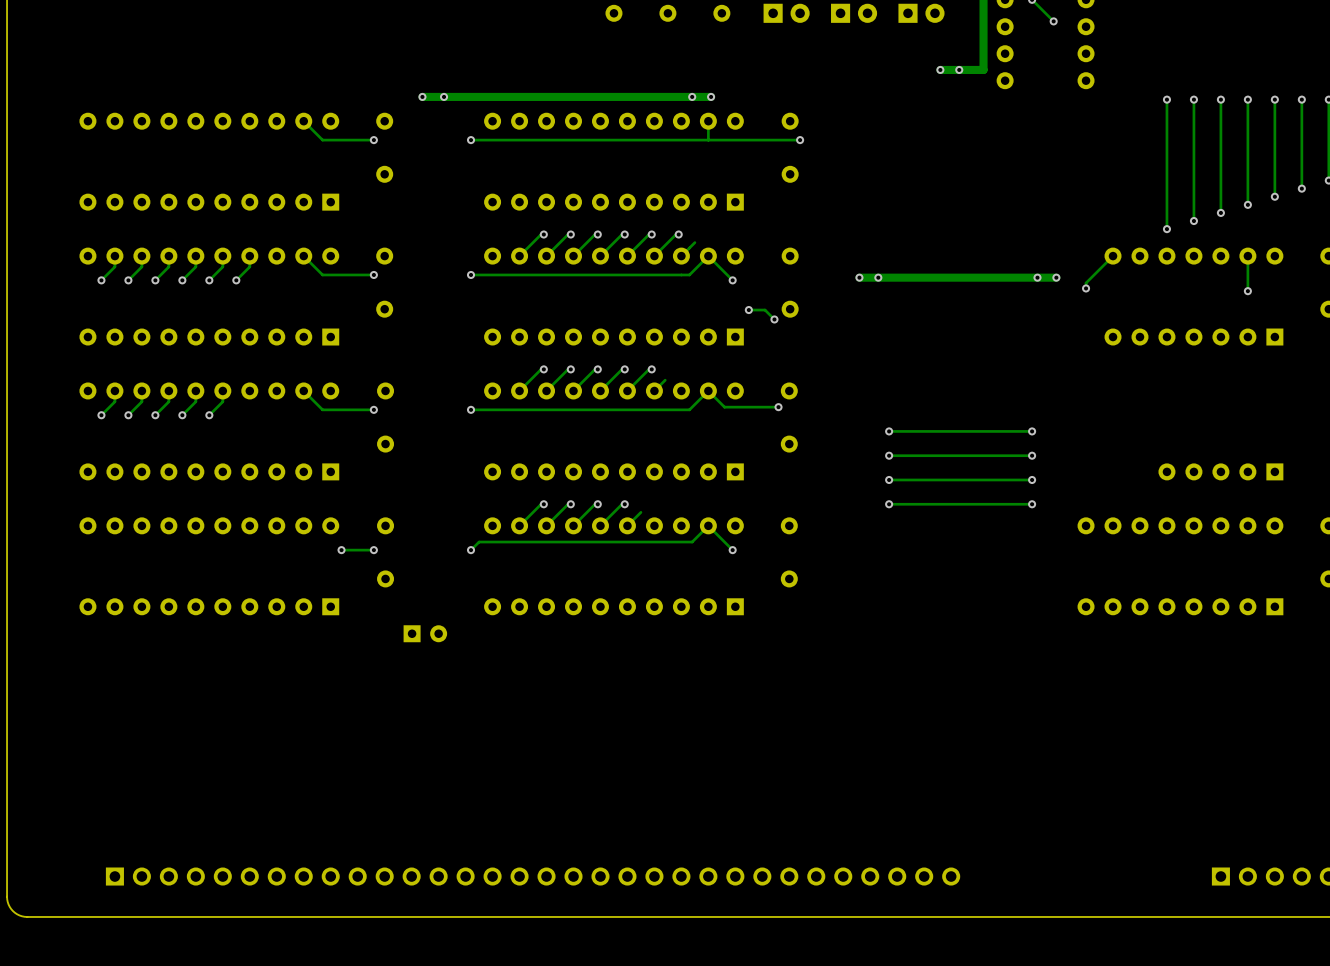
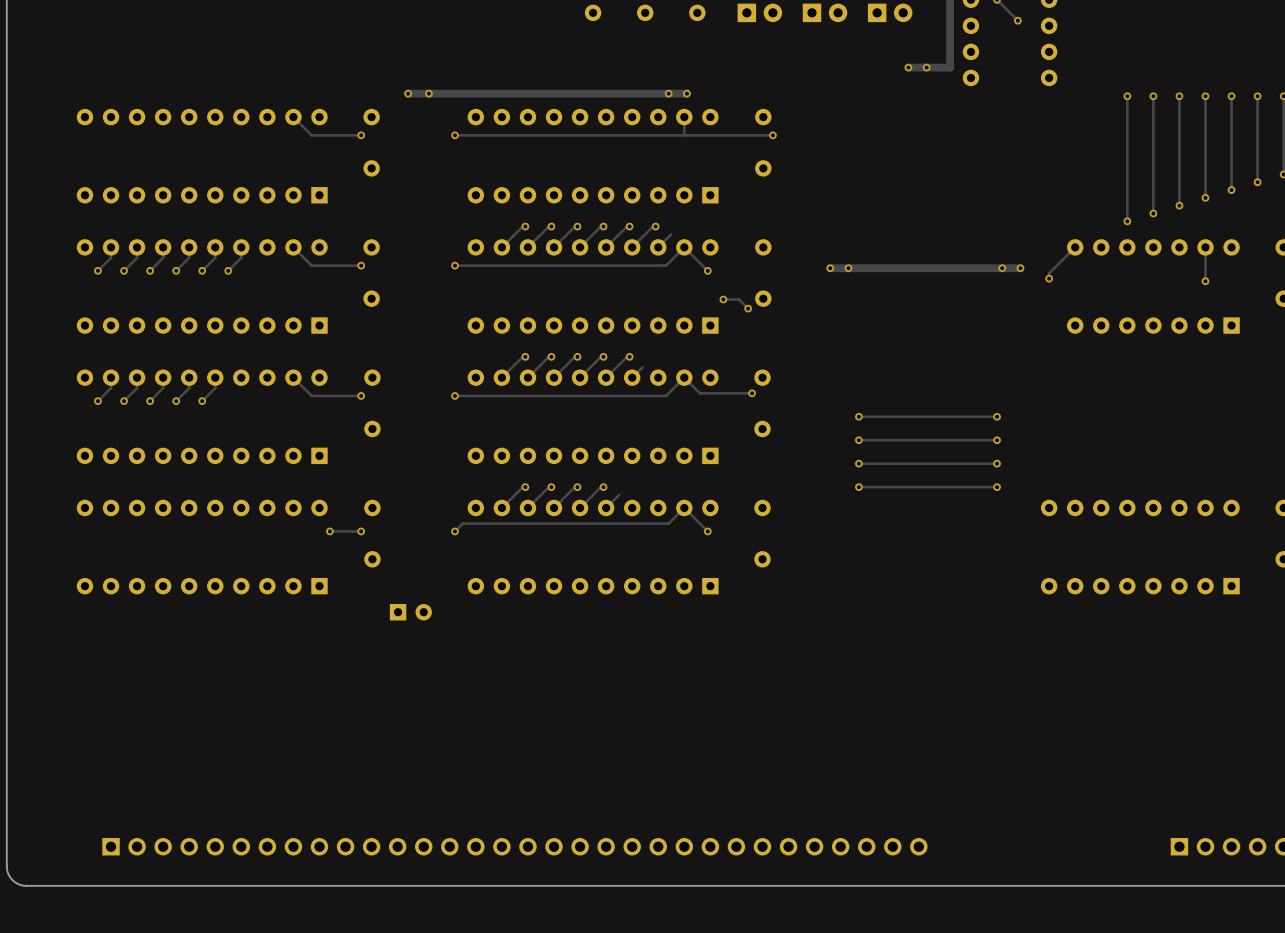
part: (1220, 471) -> none

